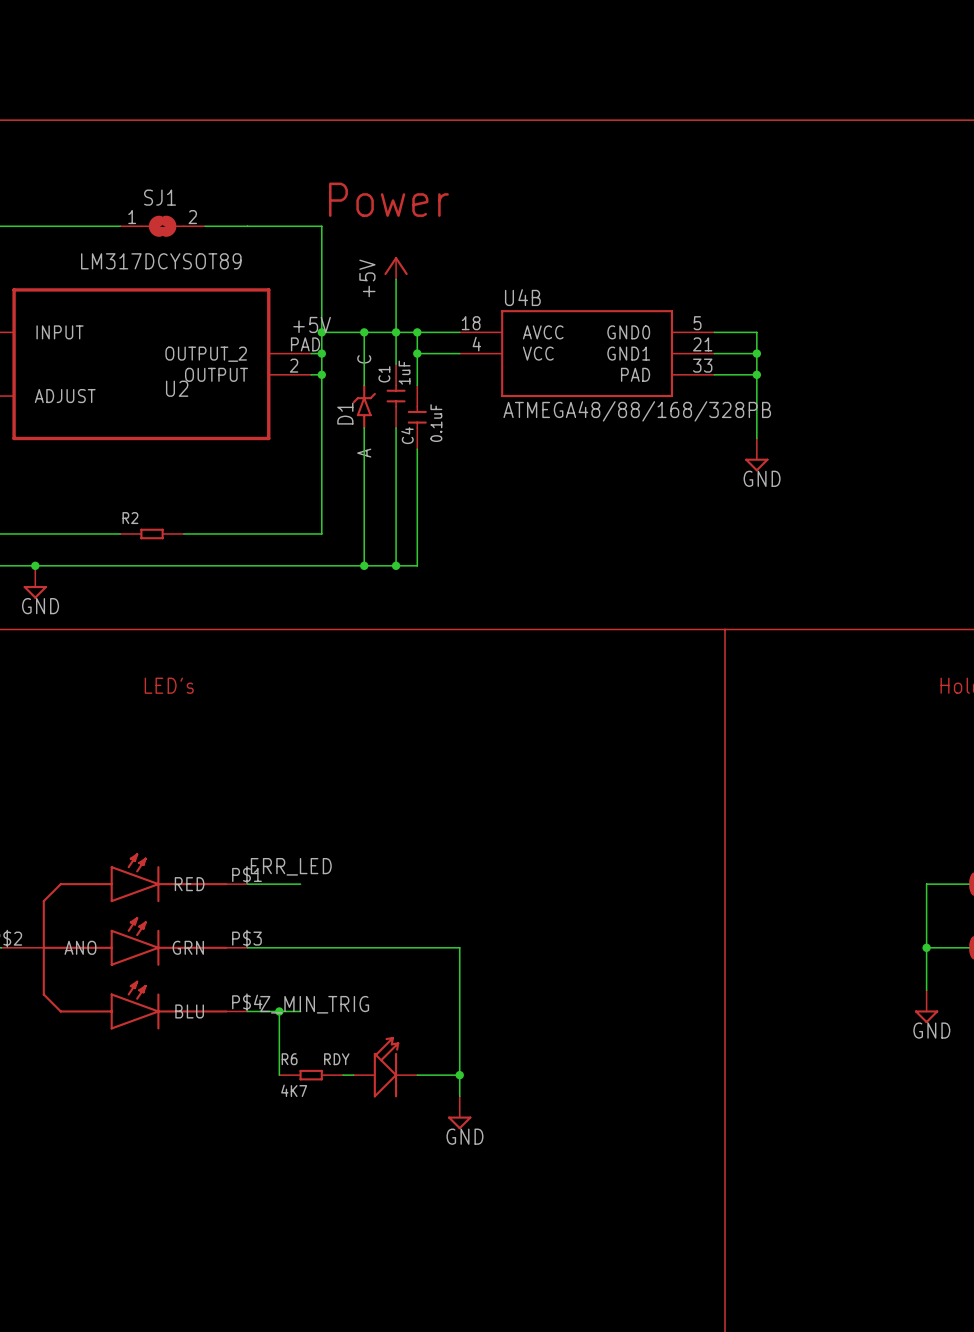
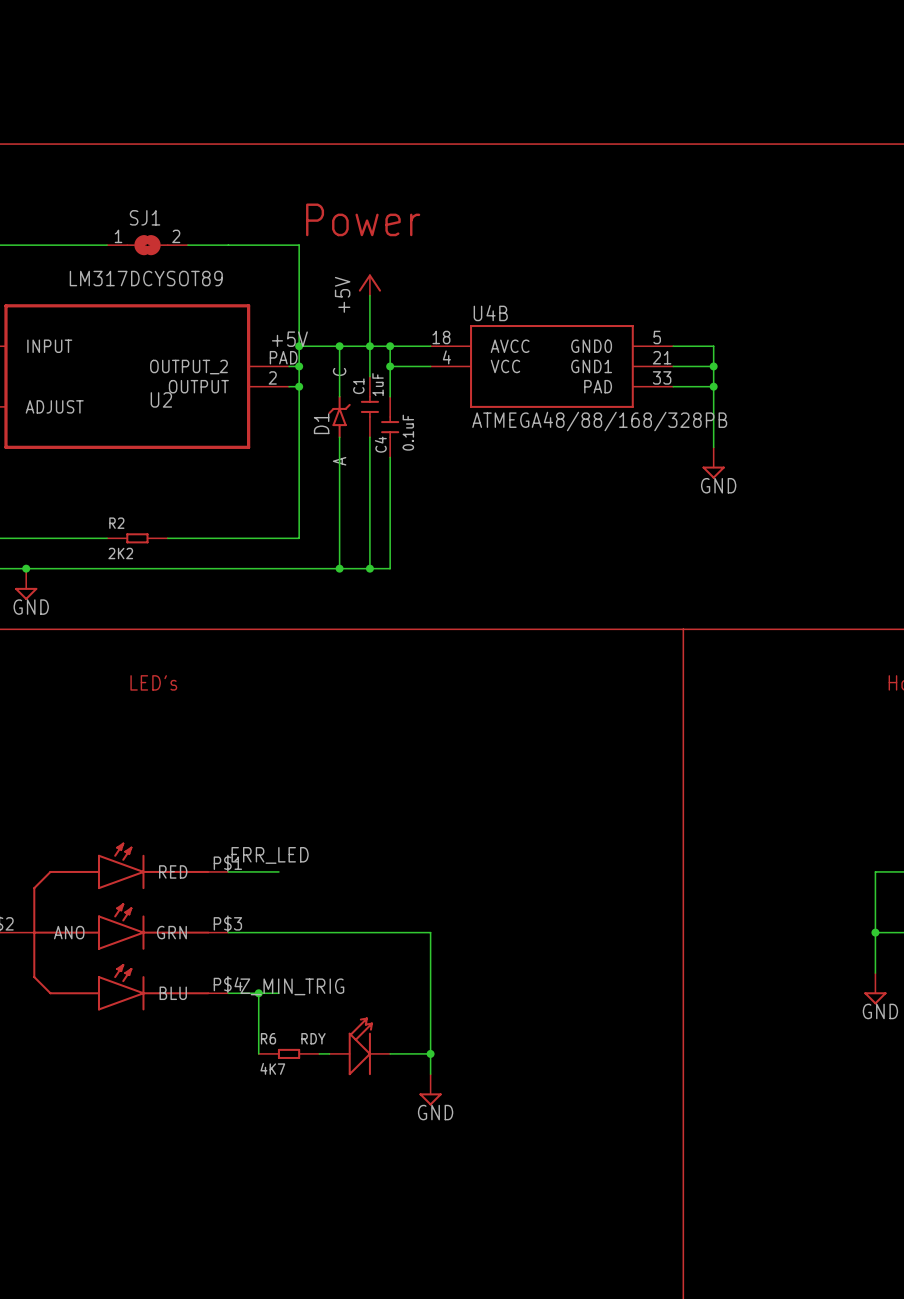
R2 value: none -> 2K2 (120, 553)

